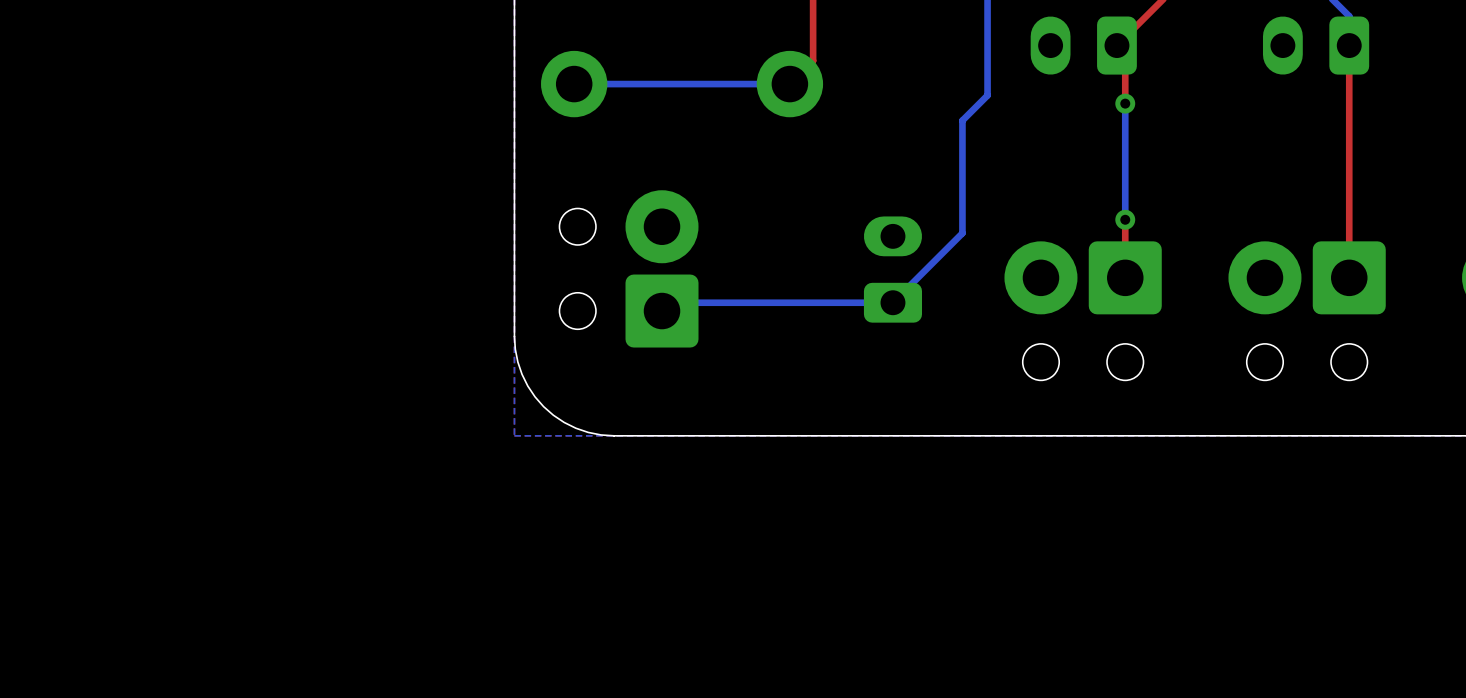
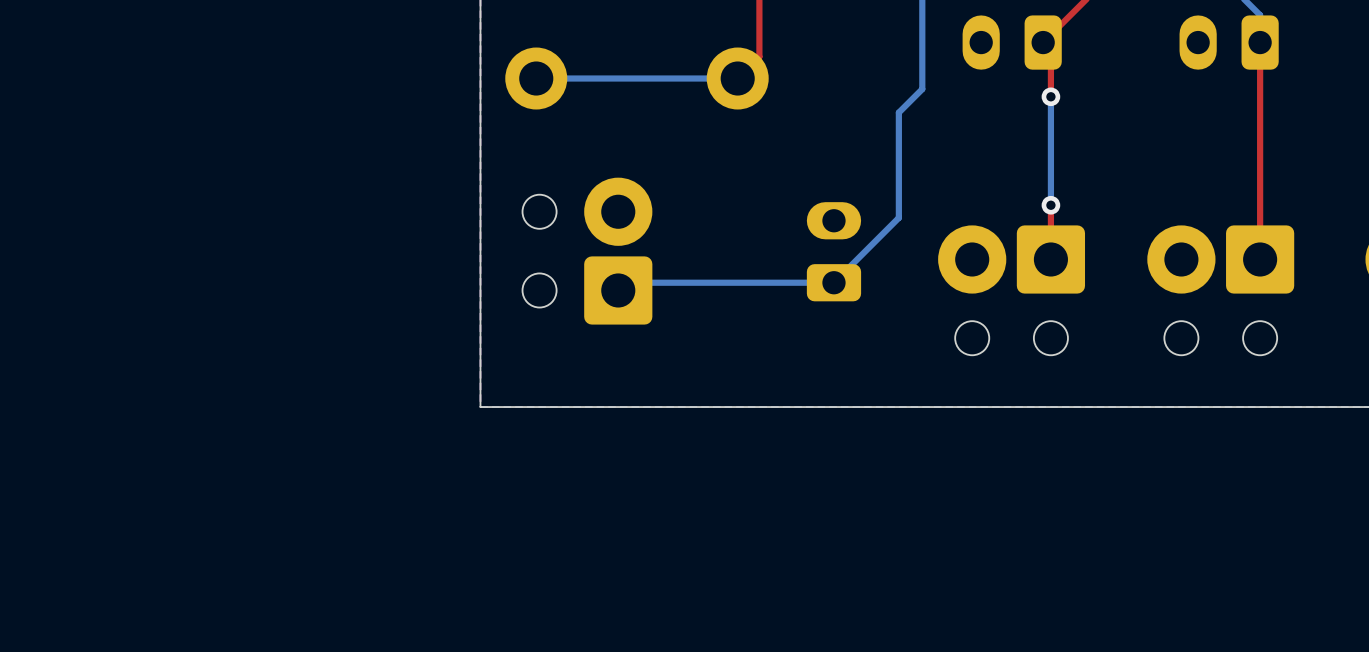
board edge: (514, 336) (515, 349) (522, 374) (535, 396) (543, 406) (564, 422) (575, 428) (588, 432) (614, 435) -> (480, 314) (480, 407) (573, 407)

